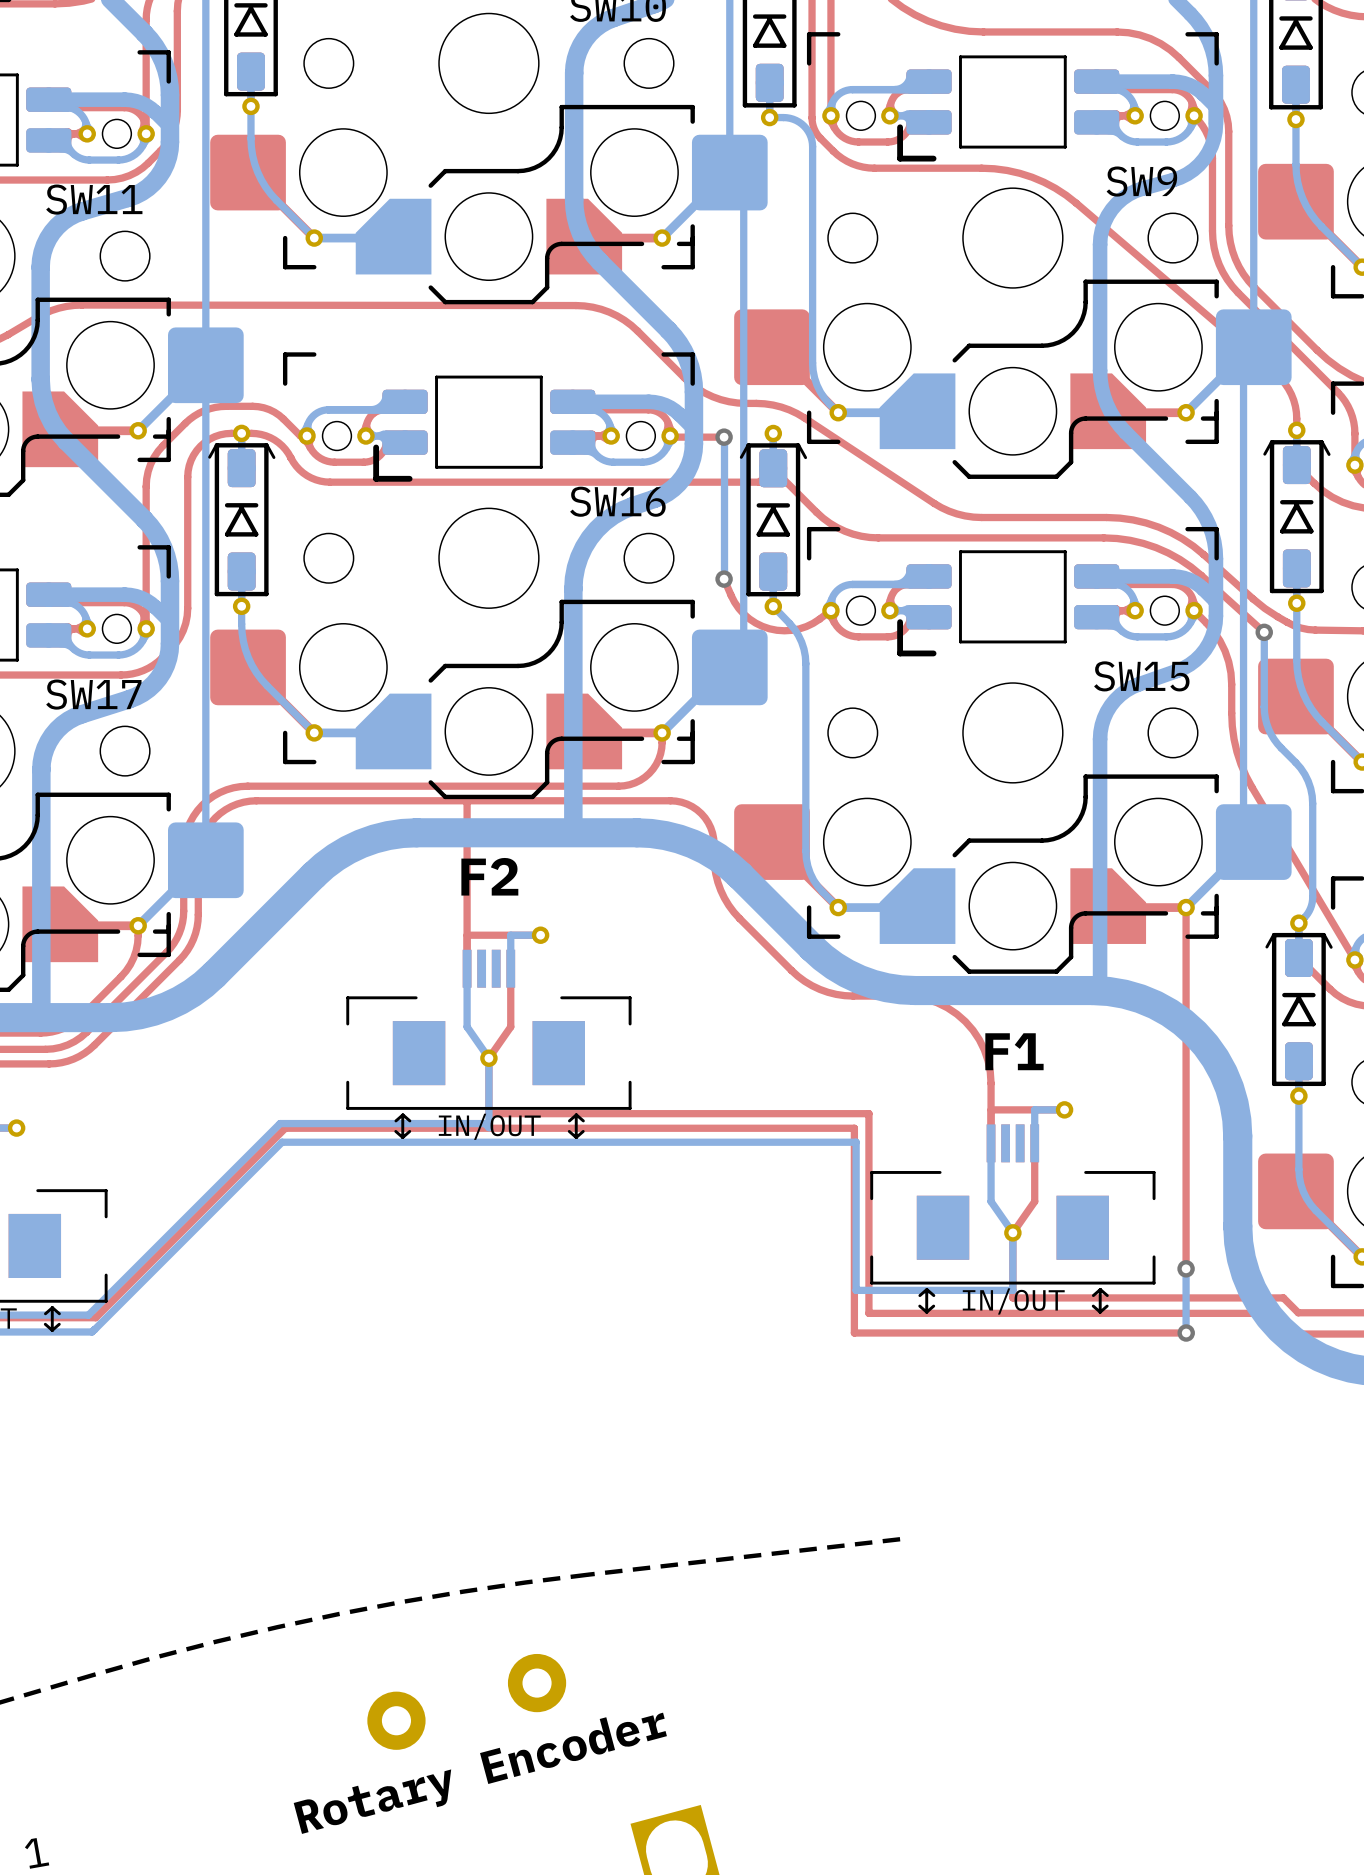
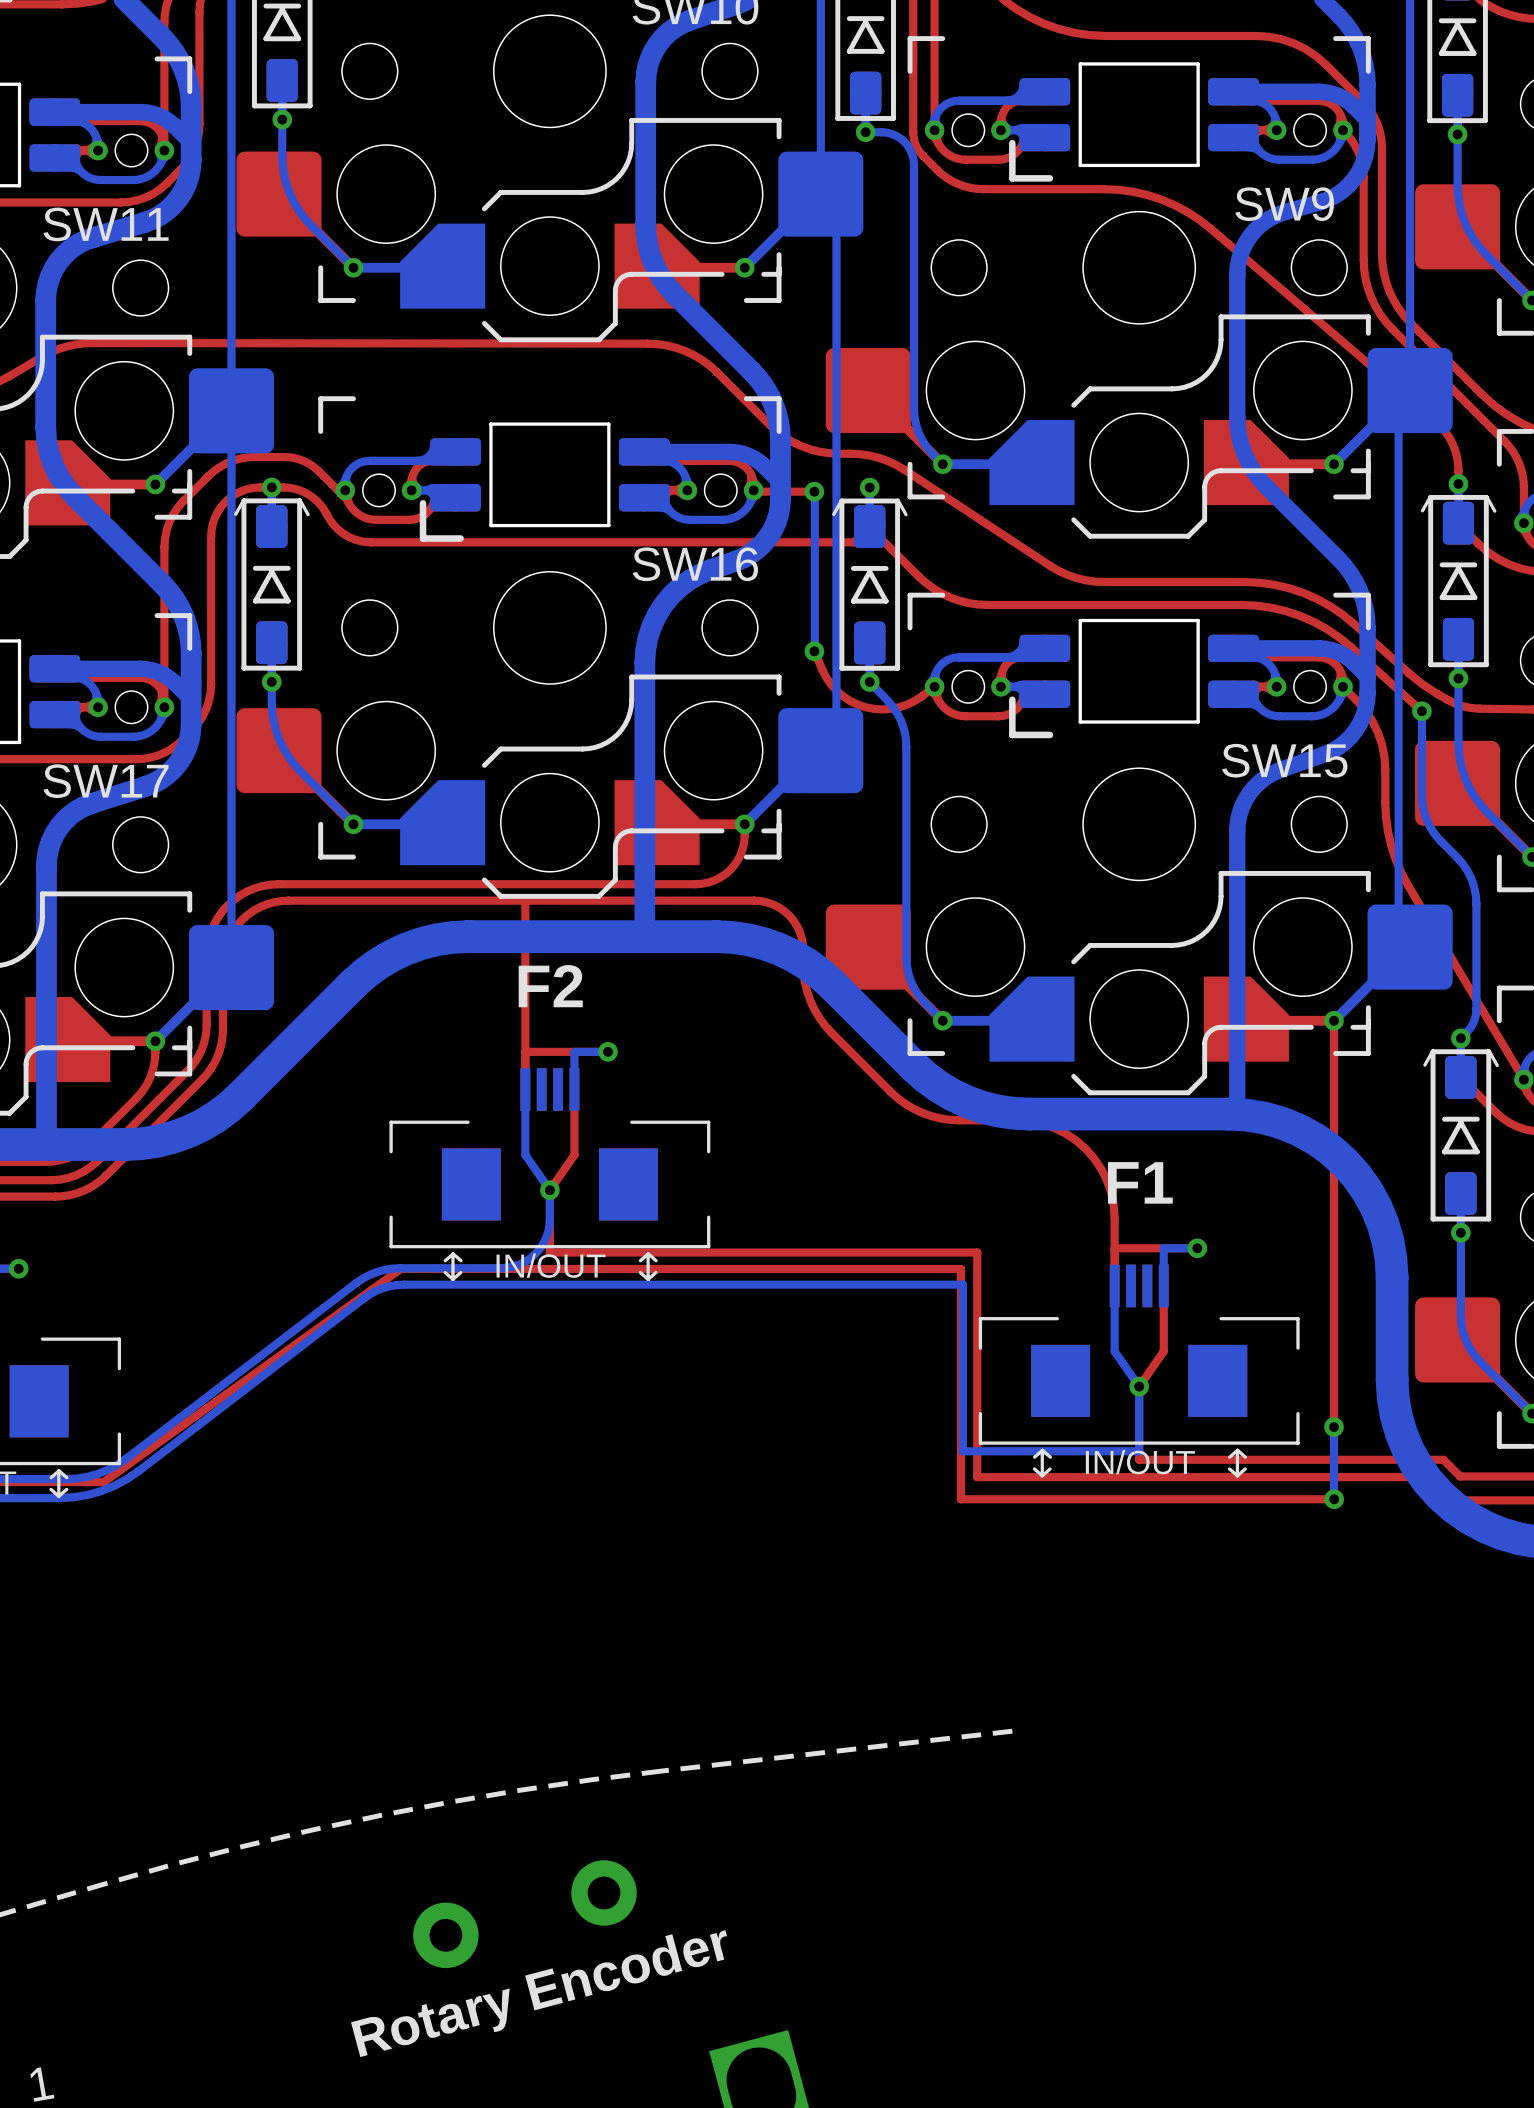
bottom track: (488, 1083) (488, 1127) (484, 1123) (280, 1123) (88, 1315) (58, 1315) -> (549, 1219) (548, 1231) (539, 1248) (525, 1261) (513, 1266) (392, 1268) (376, 1272) (362, 1278) (117, 1464) (97, 1473) (66, 1479)
top track: (356, 1128) (285, 1128) (95, 1317) (92, 1317) -> (400, 1268) (103, 1482)
bottom track: (359, 1142) (282, 1142) (94, 1329) -> (403, 1284) (382, 1288) (364, 1298) (126, 1479) (101, 1491) (87, 1495) (59, 1498)
bottom track: (94, 1329) (92, 1331) (52, 1331) -> none

